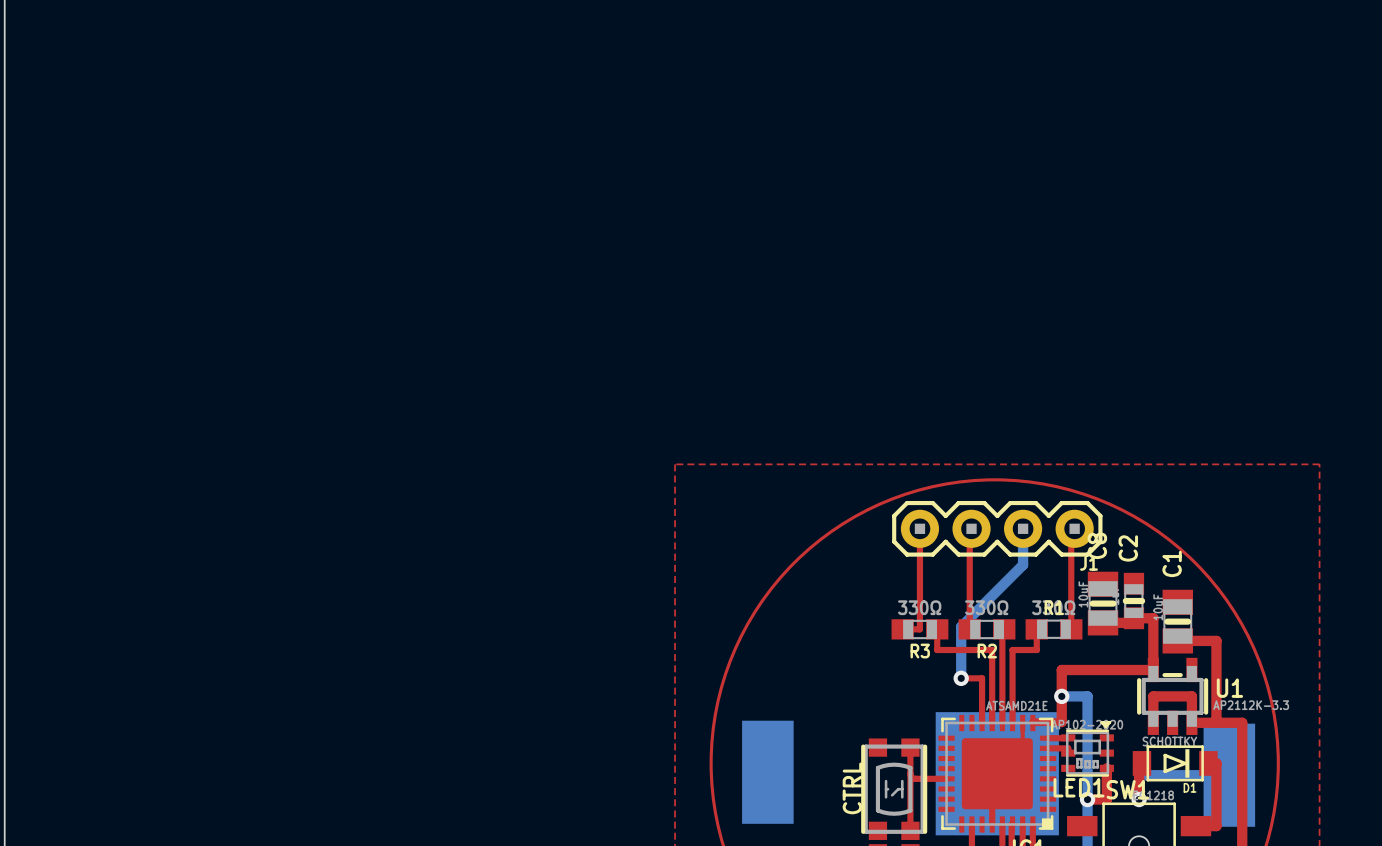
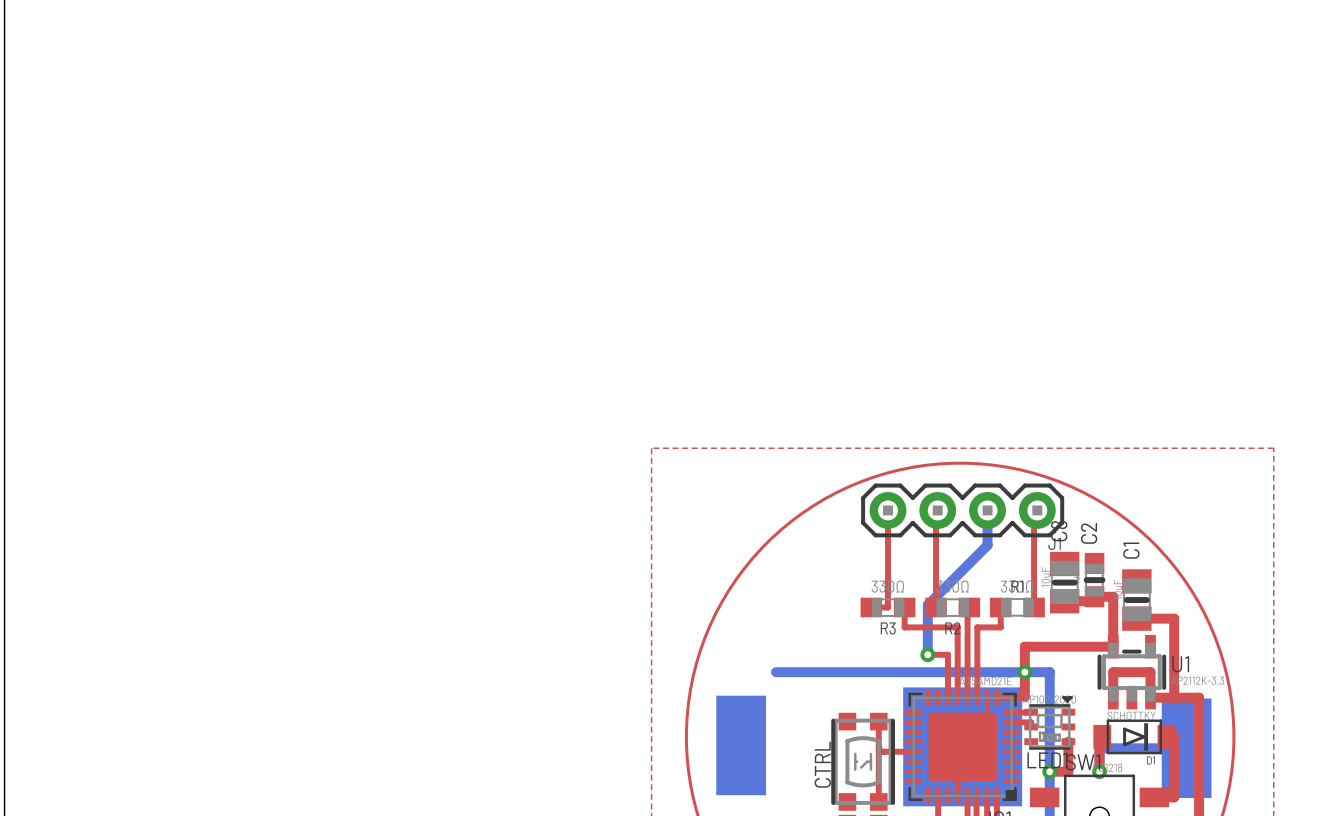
bottom track: none -> (776, 672) (1024, 672)

